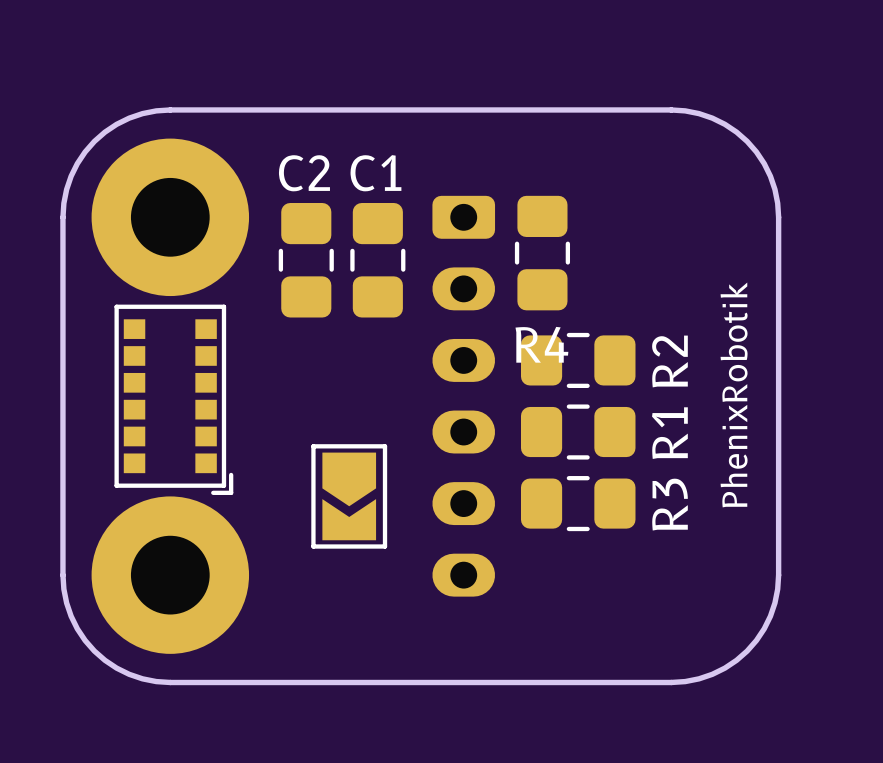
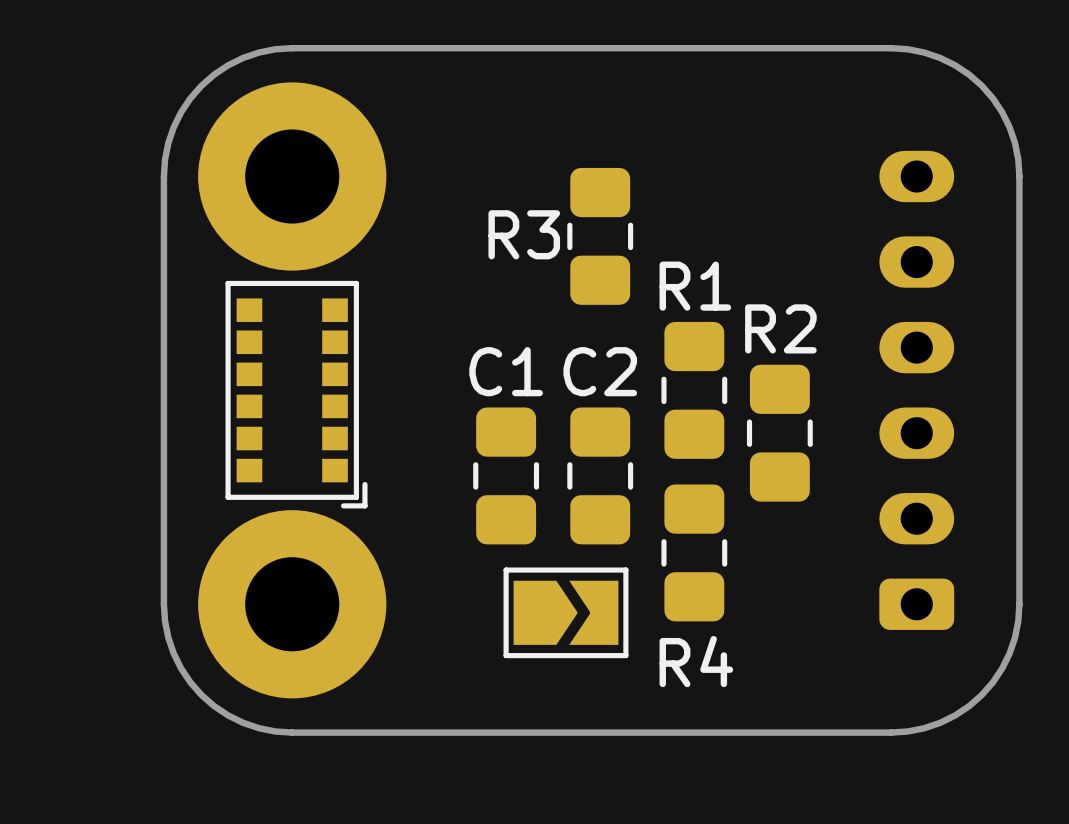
R4 position: (542, 253) -> (694, 552)
C2 position: (306, 260) -> (600, 475)
C1 position: (377, 260) -> (506, 475)
R2 rotation: 0° (578, 360) -> 90° clockwise (779, 433)
R2 position: (578, 360) -> (779, 433)
R2 name position: R2 (669, 361) -> R2 (780, 328)
text: PhenixRobotik (734, 394) -> none
part rotation: 0° (463, 396) -> 180° (916, 390)
R1 rotation: 0° (578, 432) -> 90° clockwise (694, 390)
R1 position: (578, 432) -> (694, 390)
R1 name position: R1 (669, 433) -> R1 (695, 286)
part rotation: 0° (349, 496) -> 90° counterclockwise (566, 612)
part position: (349, 496) -> (566, 612)
R3 rotation: 0° (578, 503) -> 90° clockwise (600, 236)
R3 position: (578, 503) -> (600, 236)
R3 name position: R3 (670, 504) -> R3 (524, 234)

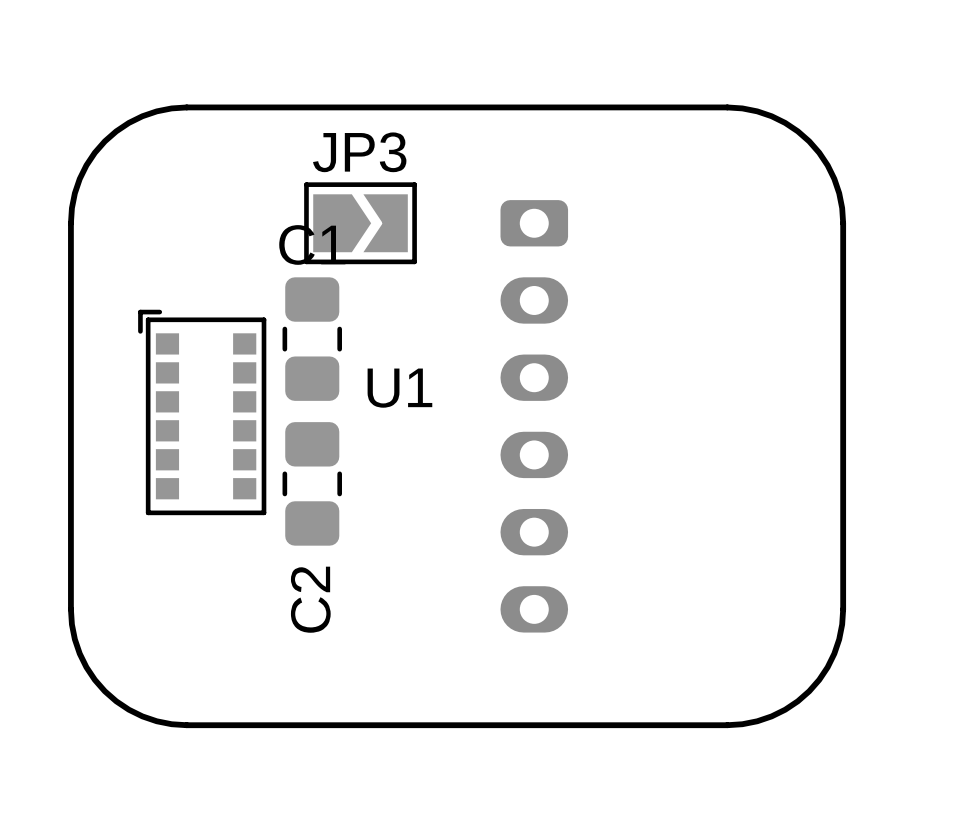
part: (292, 176) -> none
JP3: none -> (360, 223)
R3: (600, 236) -> none
C2 name rotation: 0° (600, 371) -> 90° counterclockwise (310, 599)
C2 name position: C2 (600, 371) -> C2 (310, 599)
U1: none -> (202, 412)
R1: (694, 390) -> none
part rotation: 0° (916, 390) -> 180° (534, 416)
part: (296, 394) -> none
R2: (779, 433) -> none
C1 position: (506, 475) -> (312, 339)
C2 position: (600, 475) -> (312, 483)
R4: (694, 552) -> none
part: (292, 604) -> none
part: (566, 612) -> none

